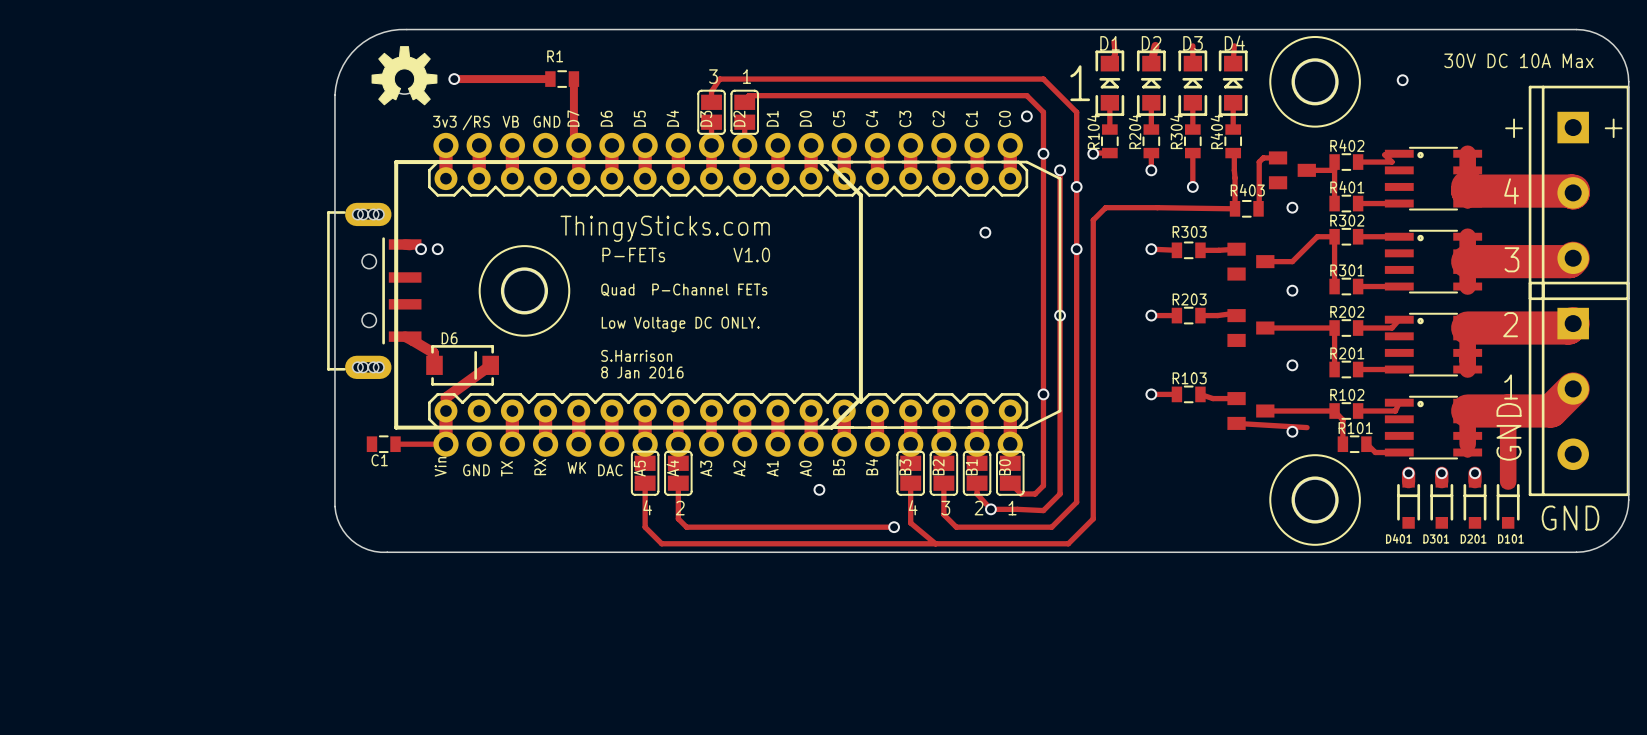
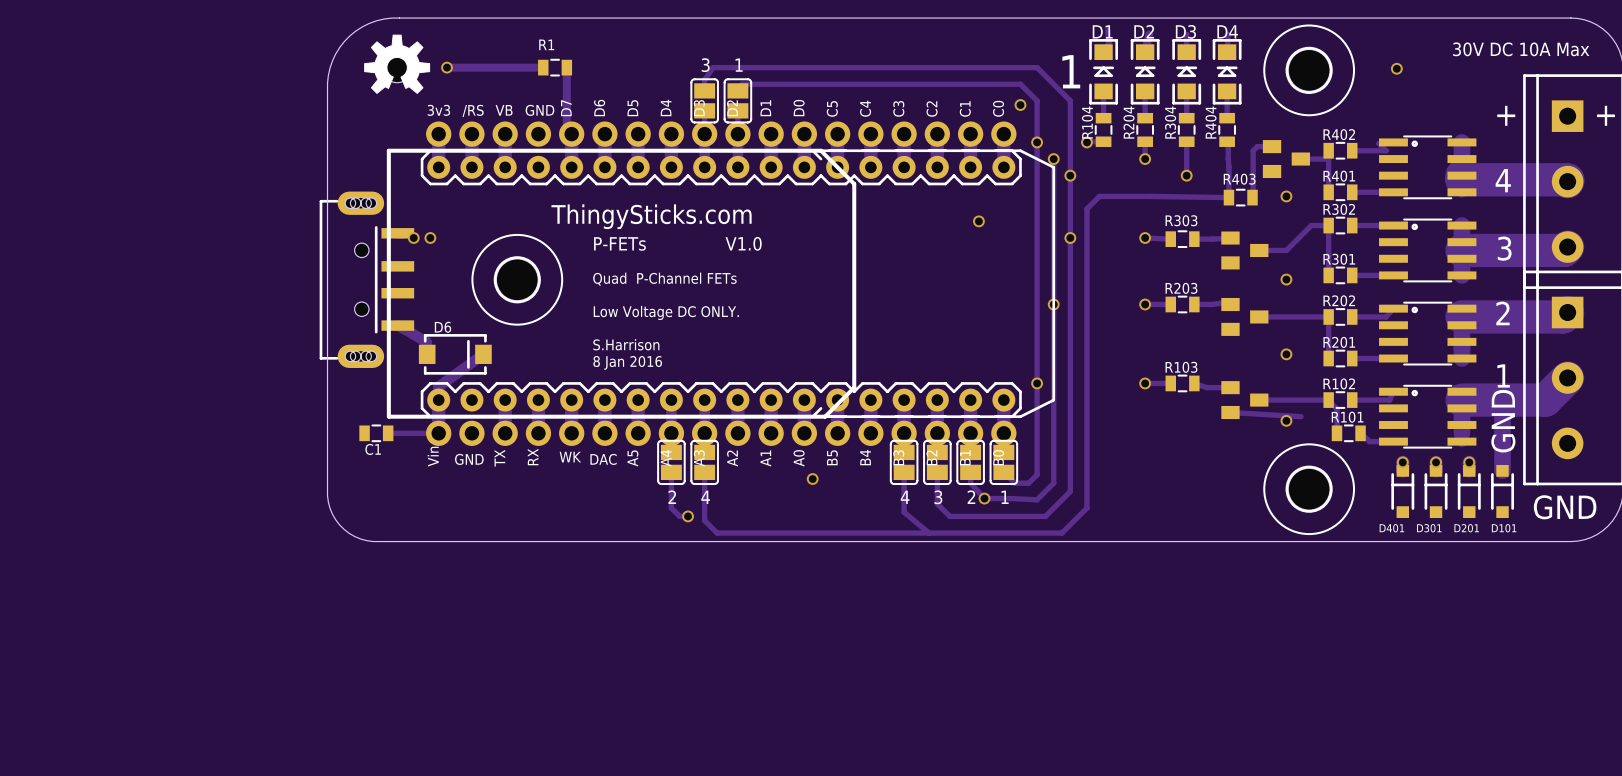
part position: (645, 473) -> (704, 462)
track: (645, 483) (645, 527) (661, 543) (723, 543) -> (704, 472) (704, 520) (717, 533)
text position: 4 (647, 507) -> 4 (705, 497)
track: (694, 527) (894, 527) -> none
via: none -> (688, 516)
via: (894, 527) -> none

